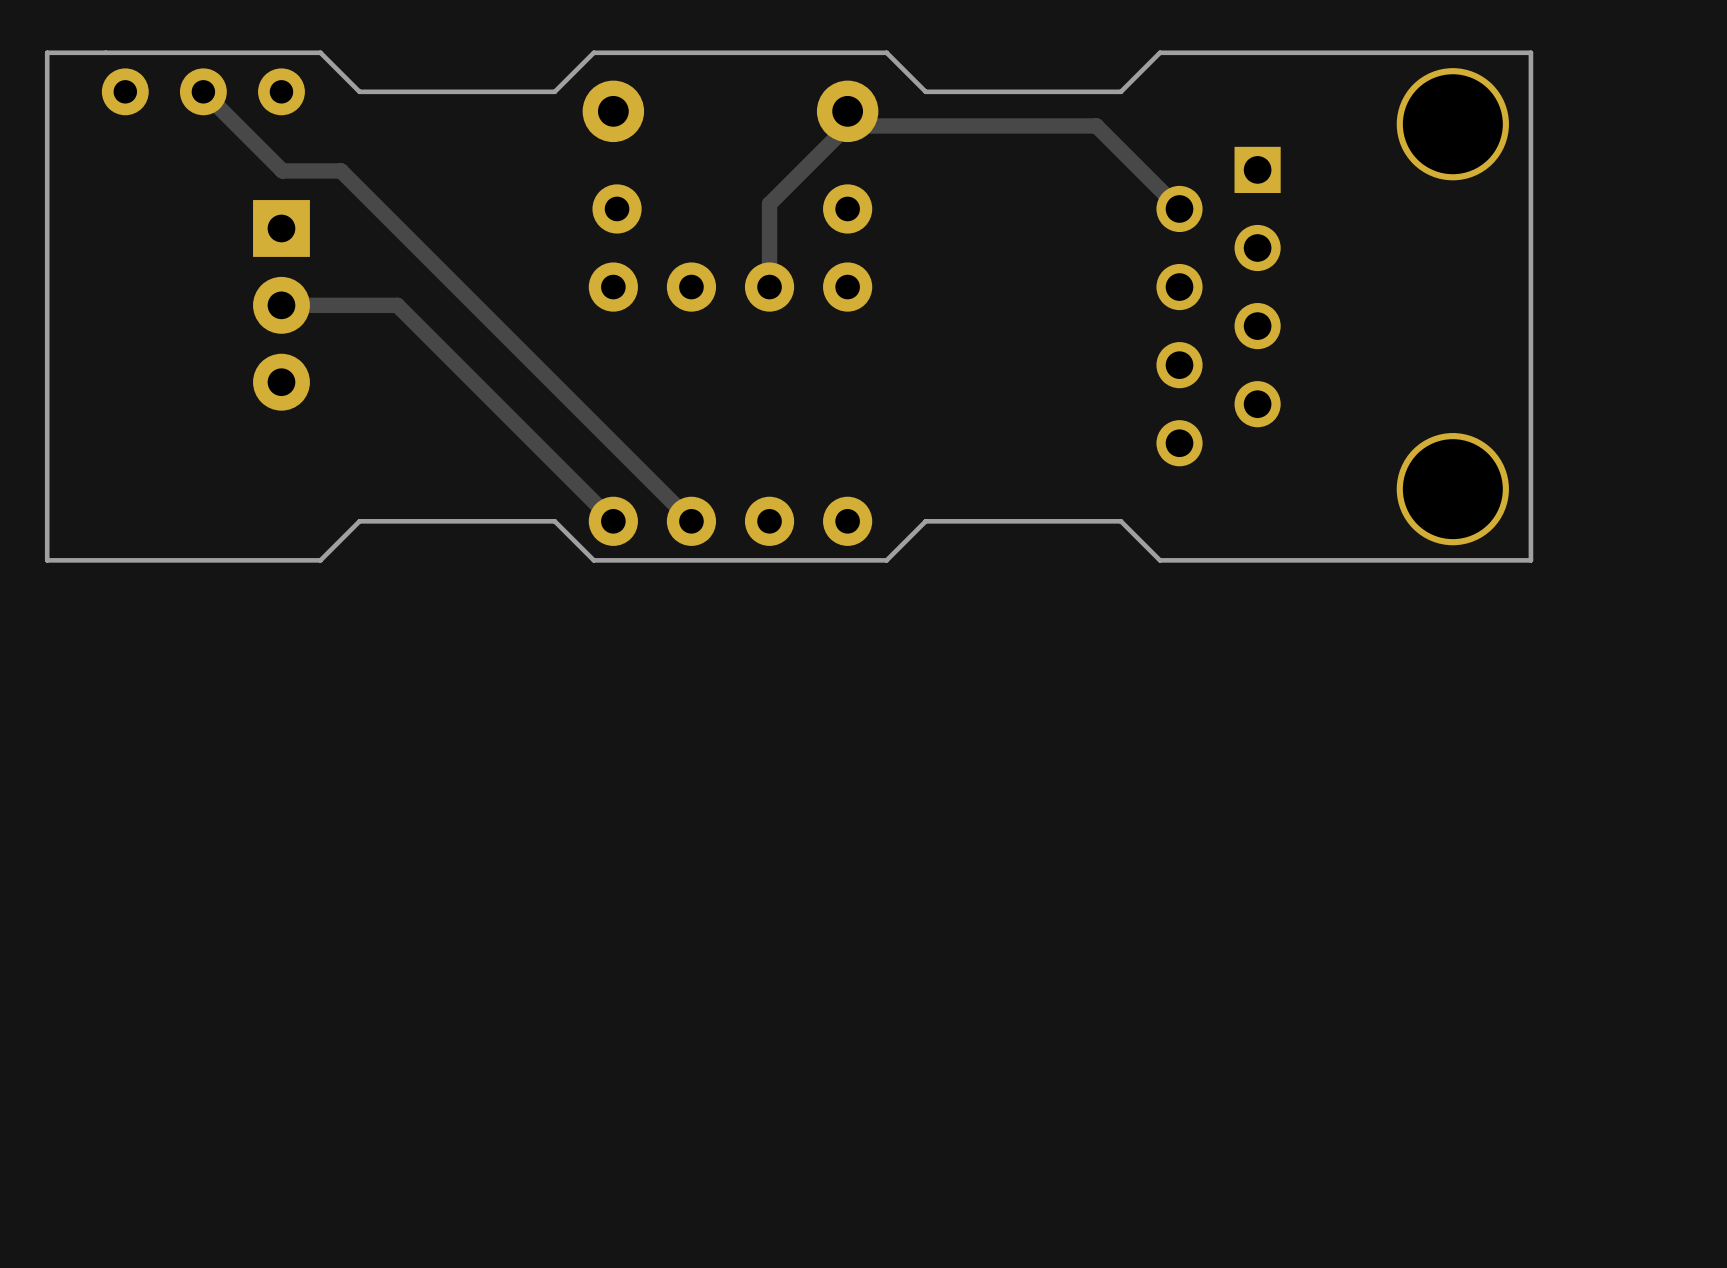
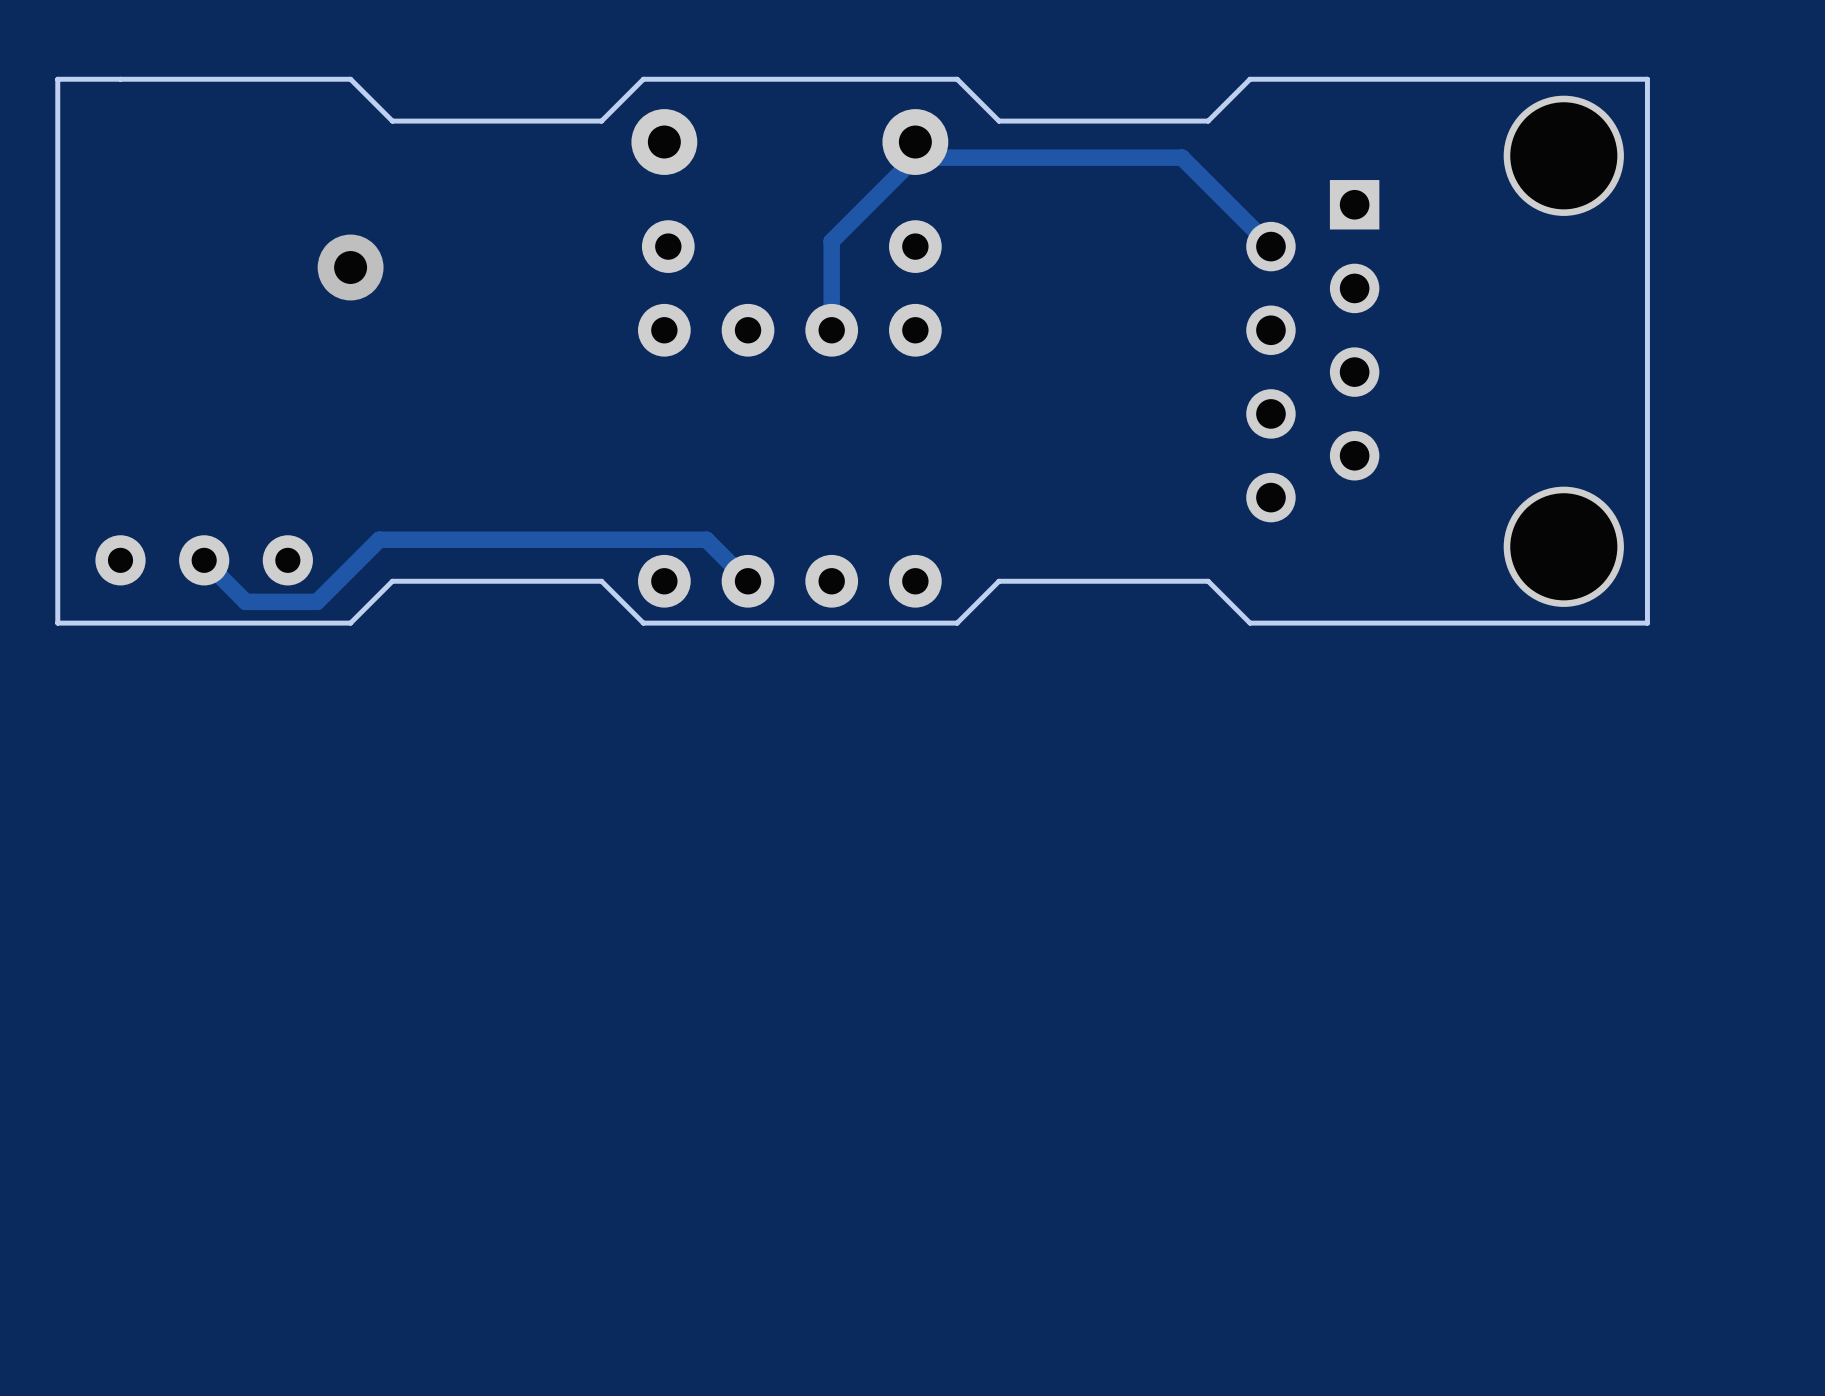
track: (203, 91) (282, 170) (341, 170) (652, 482) -> (204, 560) (245, 601) (317, 601) (379, 539) (706, 539)
part position: (203, 91) -> (204, 560)
via: none -> (350, 267)
track: (281, 305) (397, 305) (613, 521) -> none
part: (281, 305) -> none

